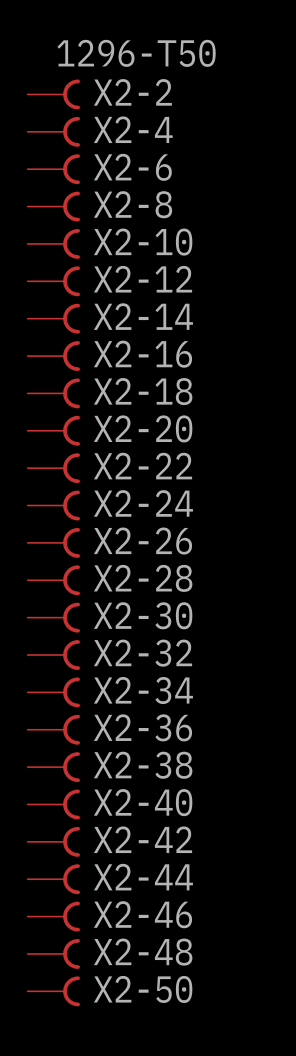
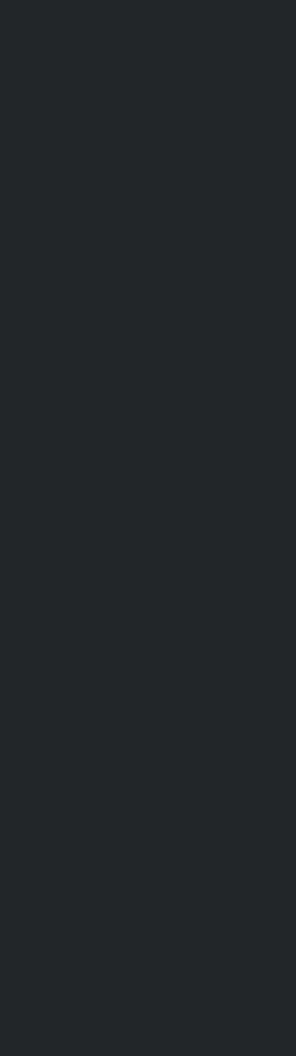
X2-2: 1296-T50 (53, 94) -> none
X2-4: (53, 131) -> none
X2-6: (53, 169) -> none
X2-8: (53, 206) -> none
X2-10: (53, 243) -> none
X2-12: (53, 281) -> none
X2-14: (53, 318) -> none
X2-16: (53, 356) -> none
X2-18: (53, 393) -> none
X2-20: (53, 430) -> none
X2-22: (53, 468) -> none
X2-24: (53, 505) -> none
X2-26: (53, 542) -> none
X2-28: (53, 580) -> none
X2-30: (53, 617) -> none
X2-32: (53, 655) -> none
X2-34: (53, 692) -> none
X2-36: (53, 729) -> none
X2-38: (53, 767) -> none
X2-40: (53, 804) -> none
X2-42: (53, 841) -> none
X2-44: (53, 879) -> none
X2-46: (53, 916) -> none
X2-48: (53, 953) -> none
X2-50: (53, 991) -> none

